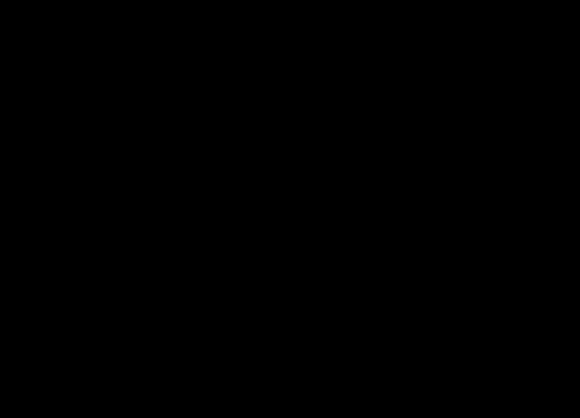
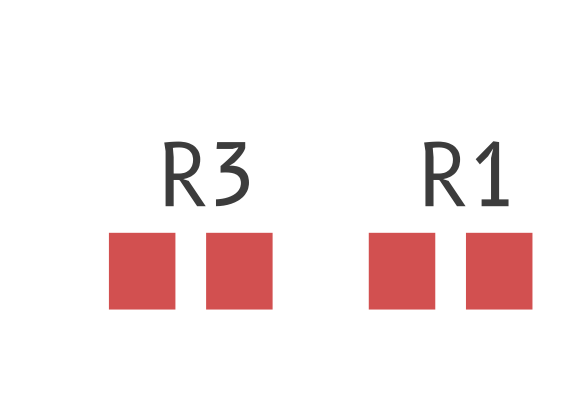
R3: none -> (190, 271)
R1: none -> (450, 271)

